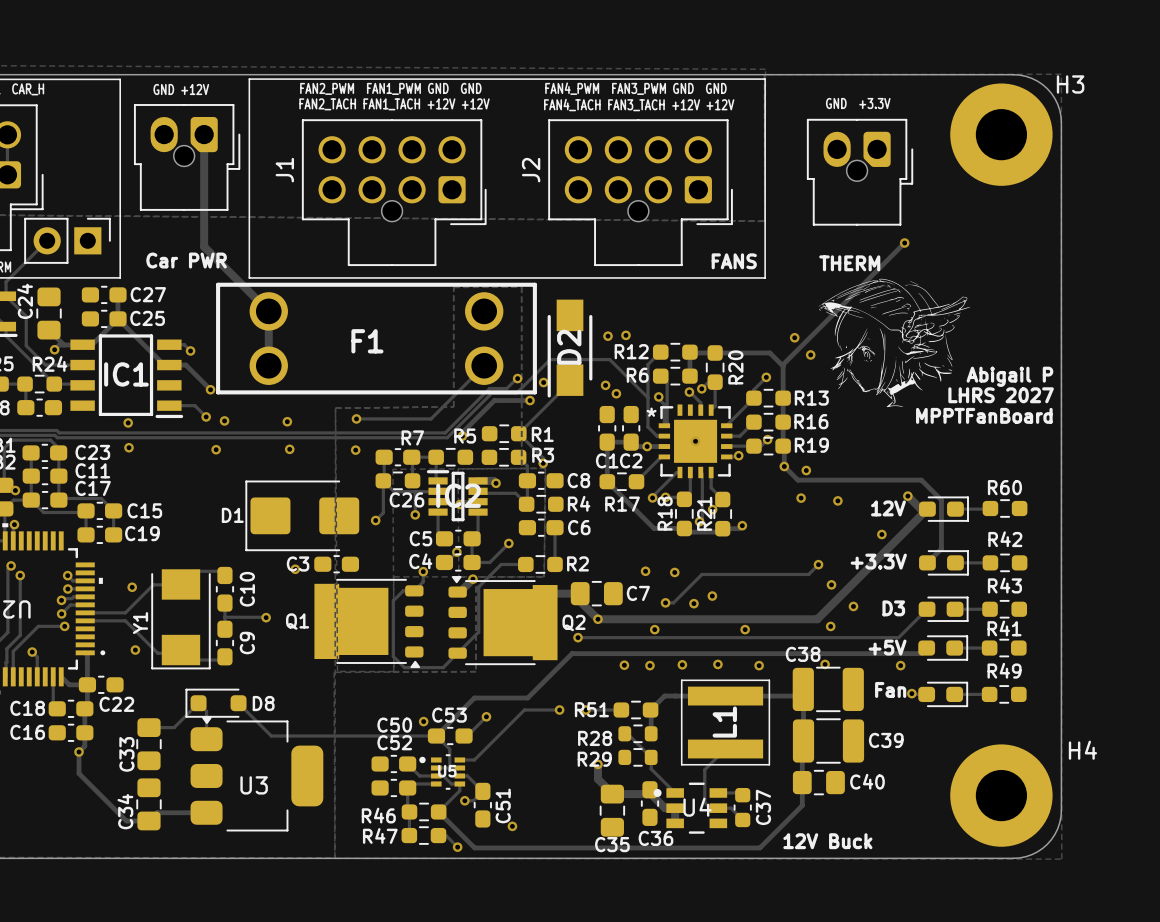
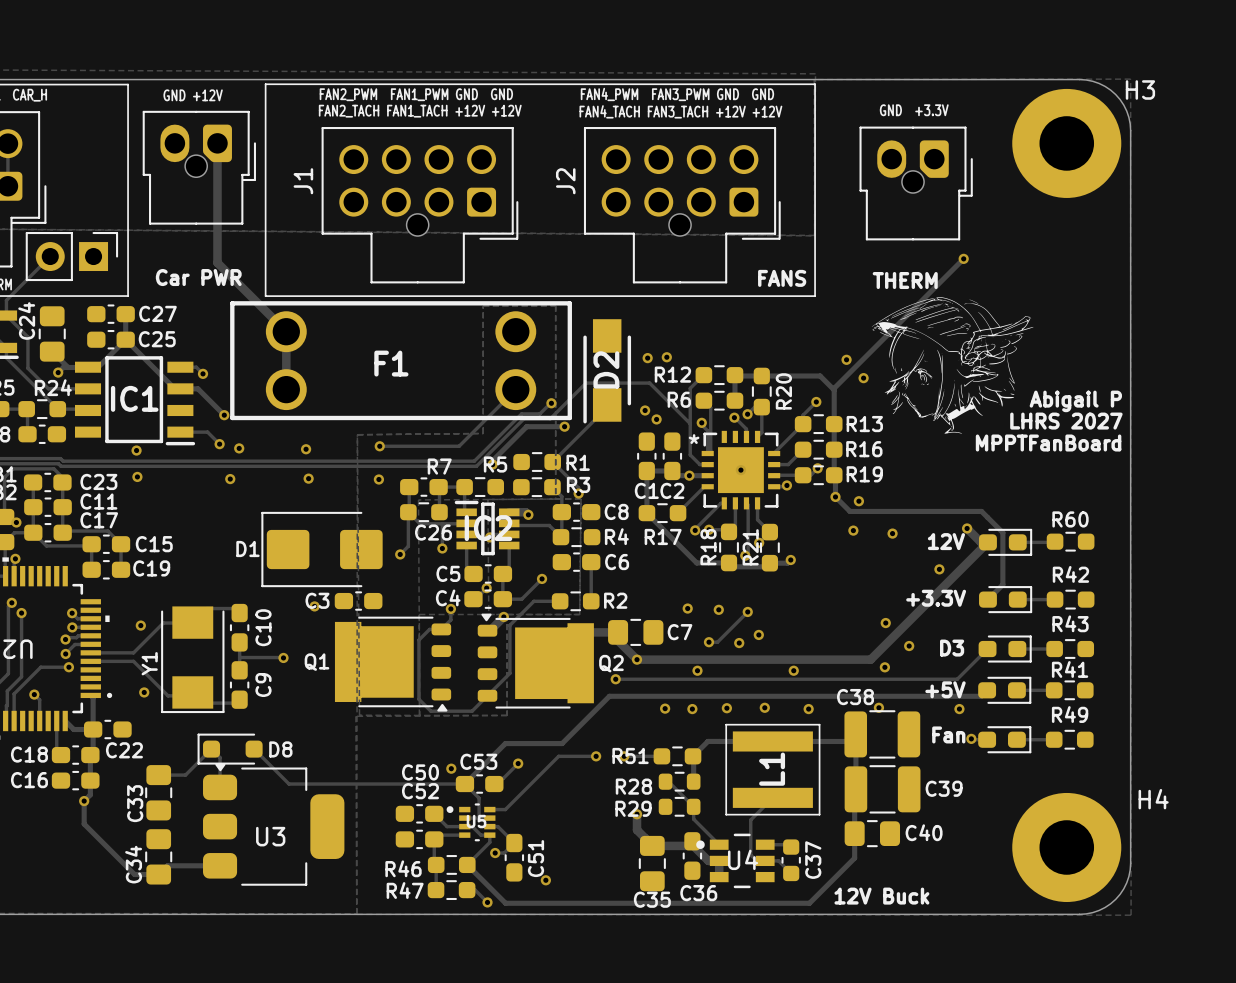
via: (543, 382) -> none
track: (818, 564) (808, 574) (701, 574) -> none
via: (818, 564) -> none
via: none -> (747, 611)

